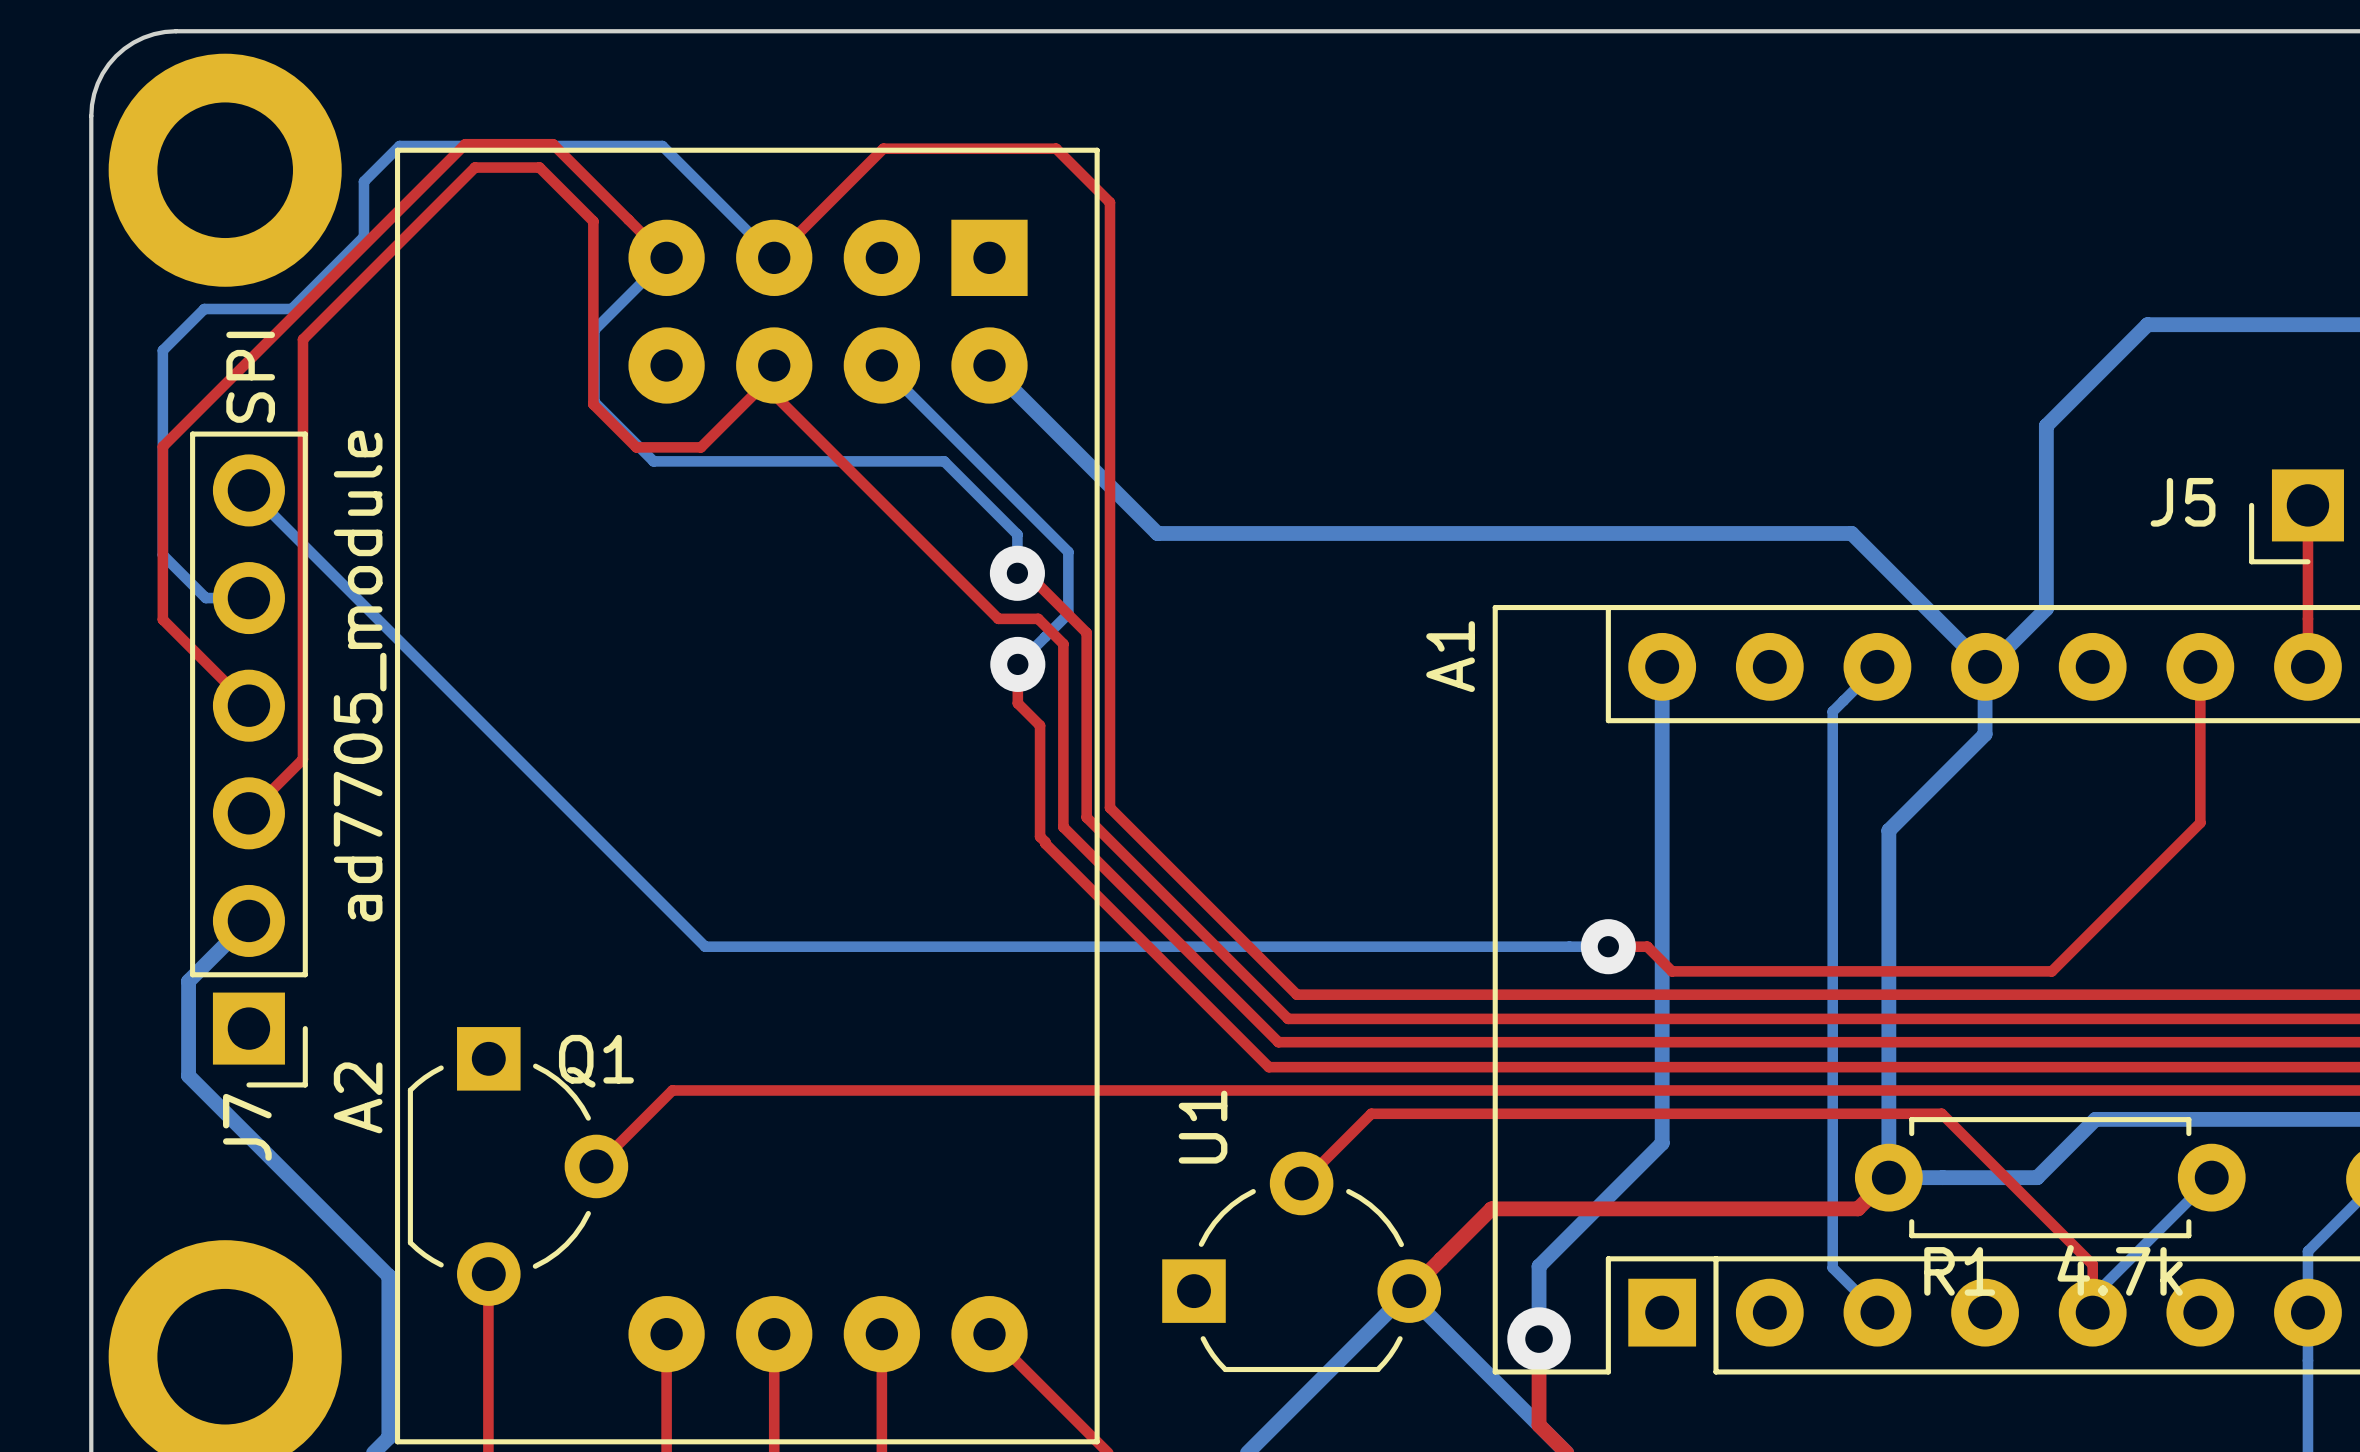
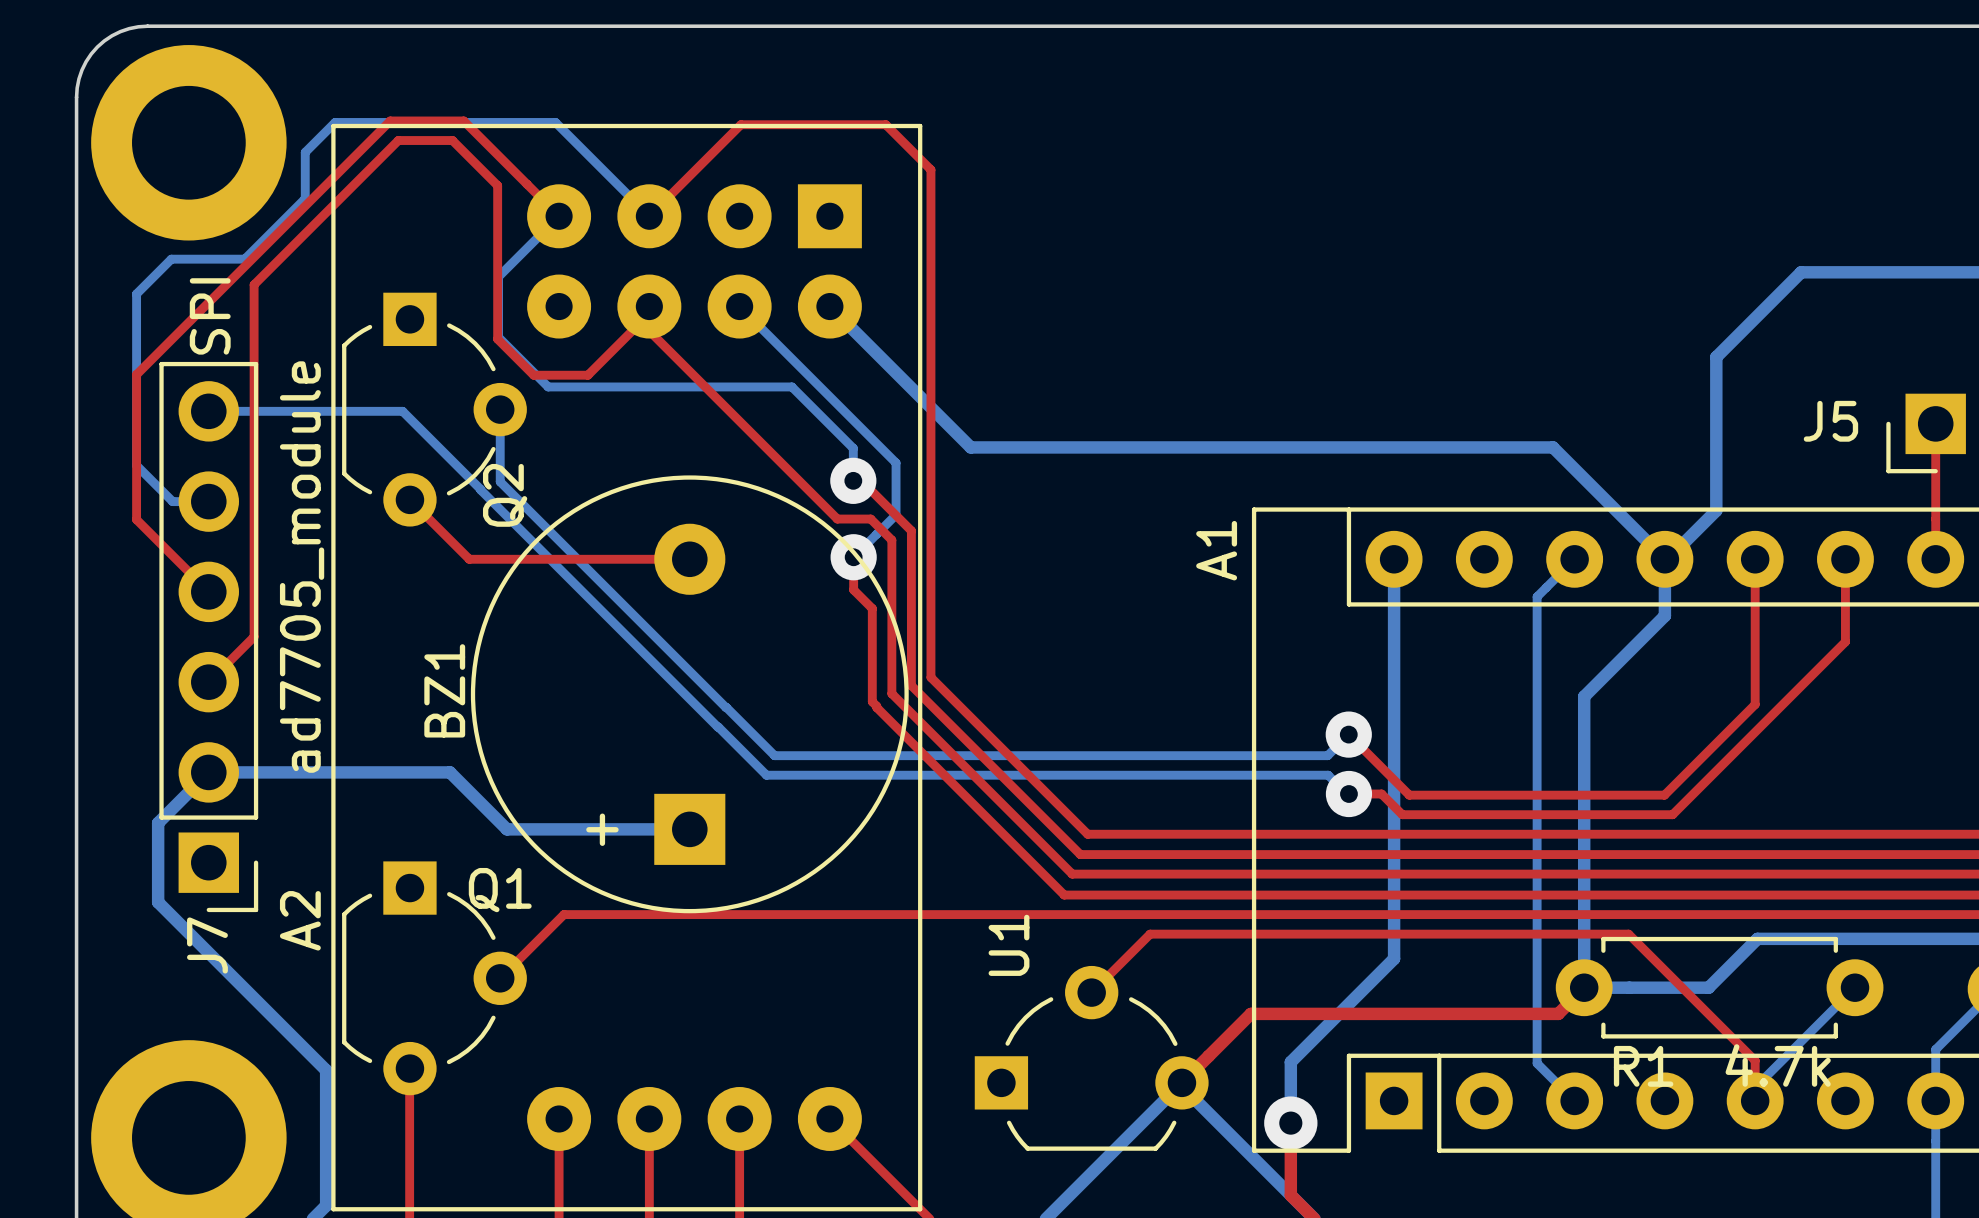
Q2: none -> (434, 409)
bottom track: none -> (500, 409) (500, 481) (725, 707)
bottom track: (248, 490) (705, 946) (1608, 946) -> (208, 411) (402, 411) (480, 489)
bottom track: none -> (480, 489) (717, 727)
top track: none -> (409, 499) (469, 559) (689, 559)
top track: none -> (1755, 559) (1755, 704) (1664, 795) (1409, 795) (1348, 734)
top track: (2200, 765) (2200, 822) (2051, 971) (1994, 971) -> (1845, 641) (1672, 814)
BZ1: none -> (689, 694)
bottom track: none -> (726, 707) (774, 755) (1327, 755) (1348, 734)
bottom track: none -> (718, 727) (766, 775) (1328, 775) (1348, 795)
via: none -> (1348, 734)
bottom track: none -> (208, 772) (450, 772) (507, 829) (689, 829)

